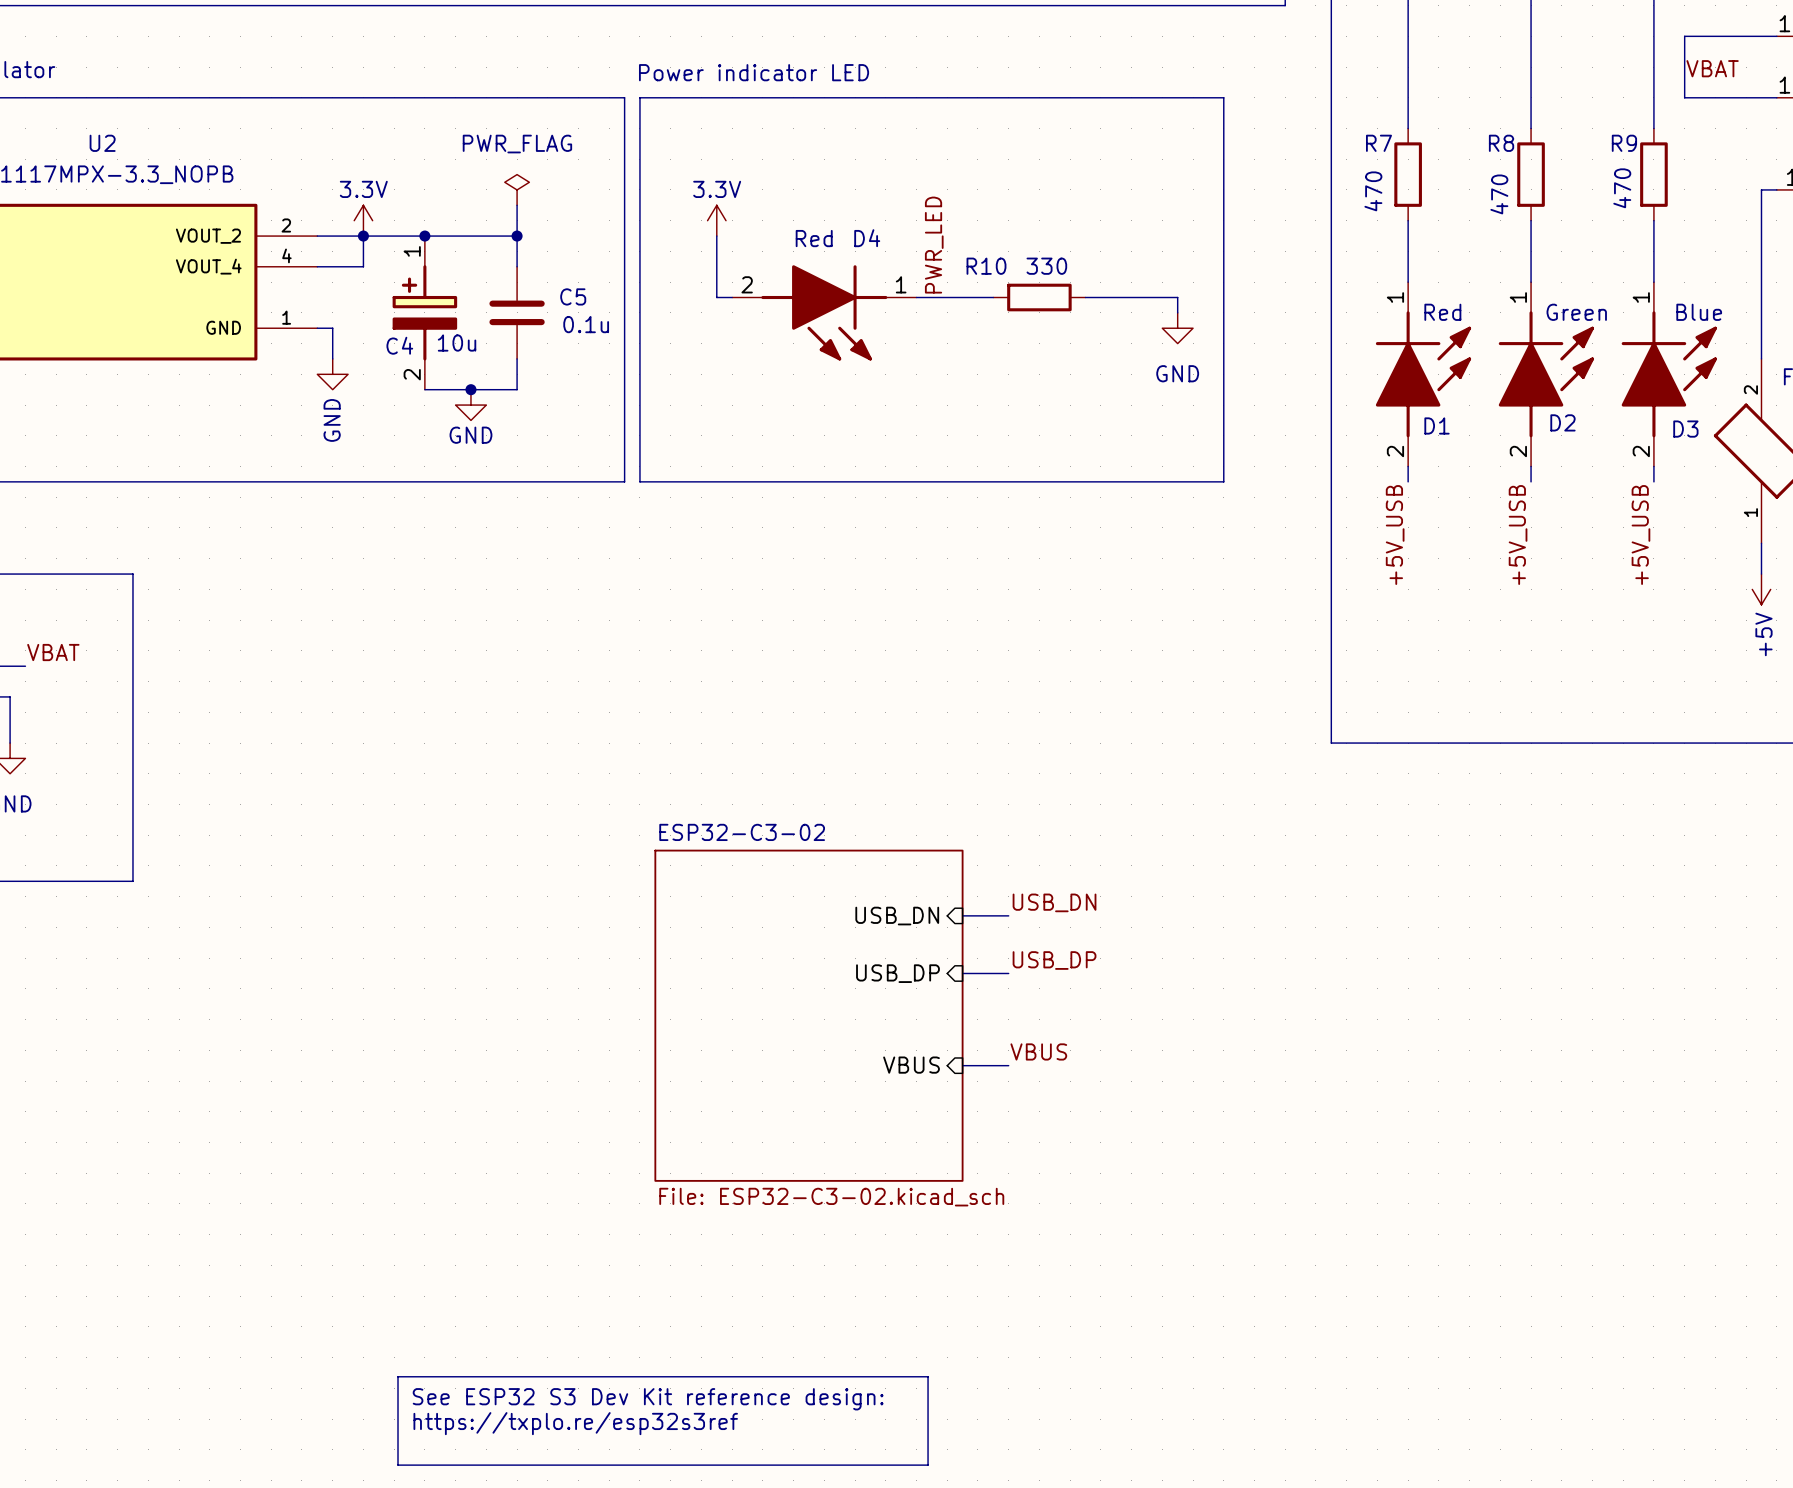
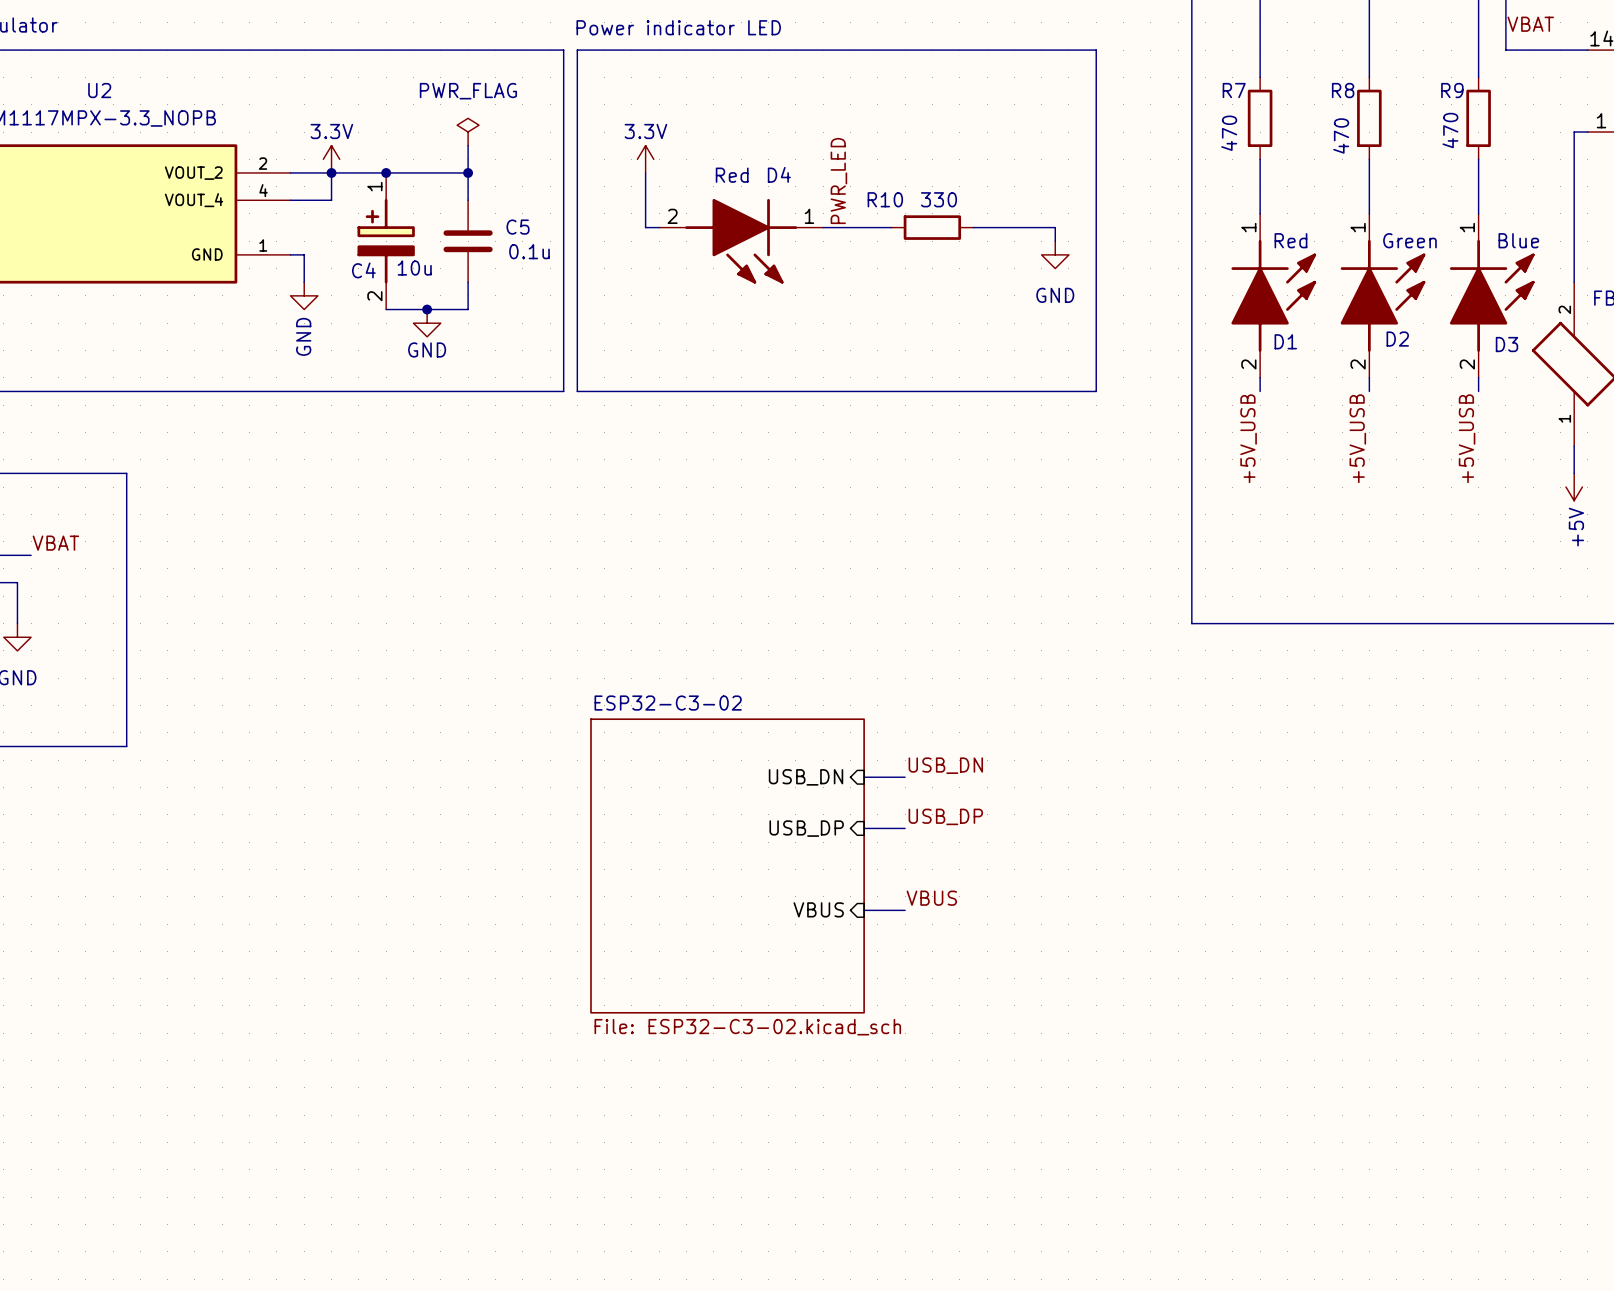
line: (398, 1376) (928, 1376) (928, 1465) (398, 1465) (398, 1376) -> none
text: See ESP32 S3 Dev Kit reference design: (648, 1399) -> none
text: https://txplo.re/esp32s3ref (575, 1423) -> none

